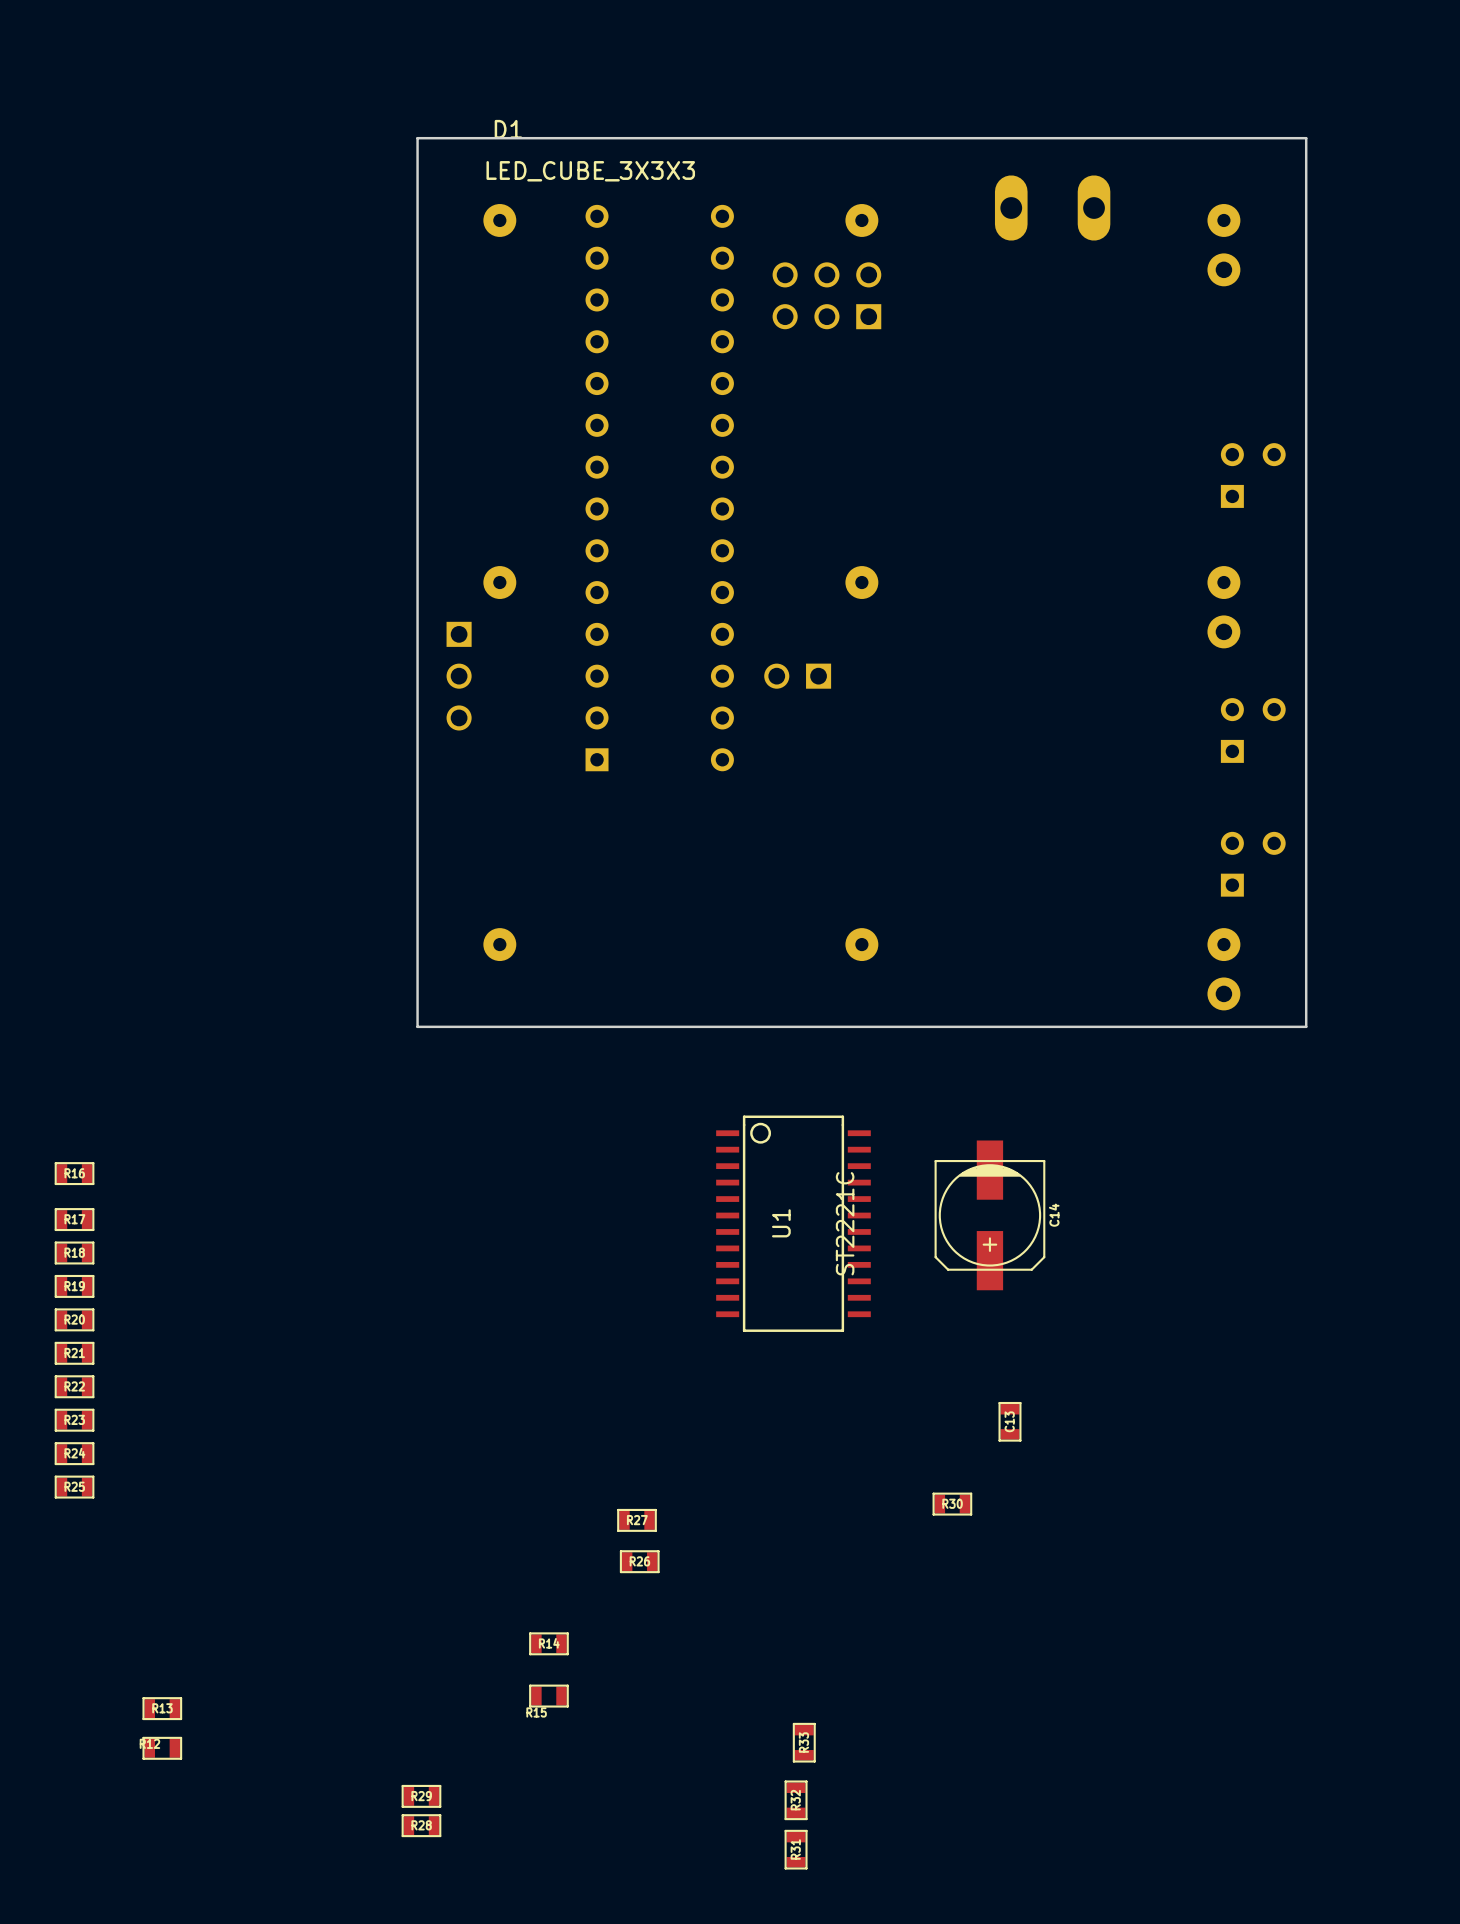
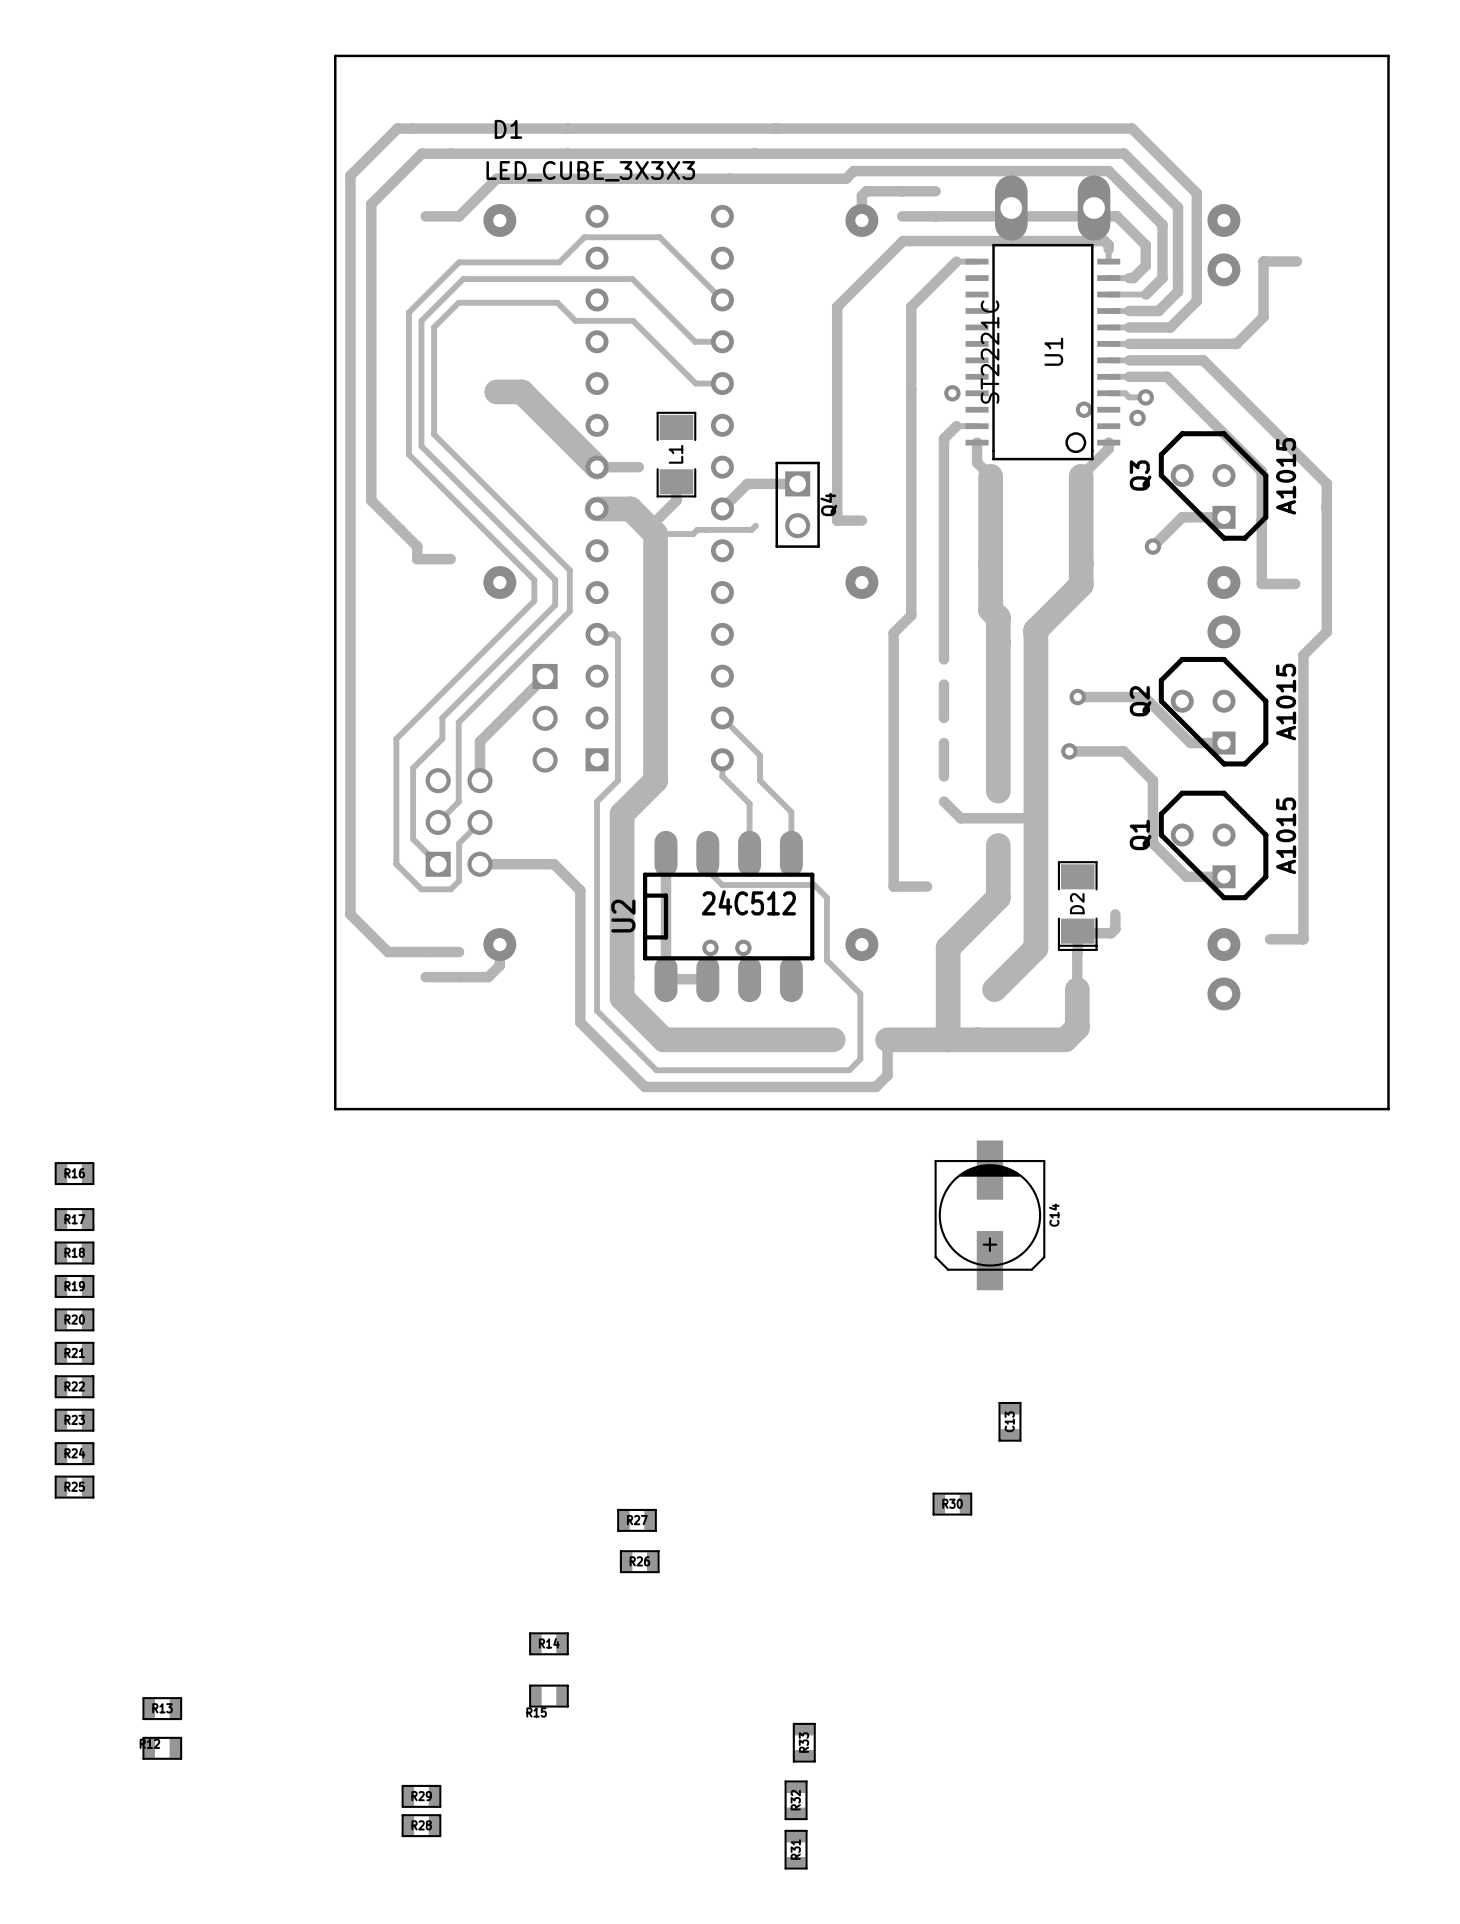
board edge: (417, 138) (417, 1026) (1306, 1026) (1306, 138) (417, 138) -> (335, 55) (335, 1109) (1388, 1109) (1388, 55) (335, 55)
track: none -> (935, 191) (866, 191) (861, 195) (861, 220)
track: none -> (425, 216) (459, 216) (496, 178) (846, 178) (853, 171) (1108, 171) (1162, 224) (1162, 278) (1146, 294) (1108, 294)
track: none -> (902, 216) (1116, 216) (1145, 245) (1145, 265) (1133, 278) (1108, 278)
track: none -> (977, 261) (956, 261) (911, 306) (911, 615) (893, 633) (893, 886) (927, 886)
track: none -> (1108, 261) (1108, 245) (1104, 241) (903, 241) (837, 306) (837, 520) (861, 520)
track: none -> (1296, 261) (1263, 261) (1263, 316) (1236, 343) (1108, 343)
part: (826, 295) -> none
track: none -> (722, 299) (659, 237) (584, 237) (559, 262) (459, 262) (408, 312) (408, 454) (534, 580) (534, 600) (396, 738) (396, 864) (421, 889) (450, 889) (459, 880) (459, 843) (479, 822)
track: none -> (1108, 310) (1158, 310) (1178, 291) (1178, 207) (1124, 153) (421, 153) (371, 204) (371, 500) (417, 546) (417, 559) (450, 559)
track: none -> (1108, 327) (1170, 327) (1196, 301) (1196, 193) (1132, 128) (397, 128) (350, 175) (350, 914) (388, 952) (459, 952)
track: none -> (722, 341) (695, 341) (632, 279) (463, 279) (421, 320) (421, 446) (555, 580) (555, 605) (442, 717) (442, 738) (413, 768) (413, 839) (438, 864)
track: none -> (1108, 360) (1203, 360) (1326, 483) (1326, 631) (1303, 655) (1303, 939) (1270, 939)
track: none -> (1108, 376) (1167, 376) (1261, 471) (1261, 583) (1295, 583)
track: none -> (722, 383) (695, 383) (633, 320) (575, 320) (557, 302) (458, 302) (434, 327) (434, 434) (569, 570) (569, 611) (458, 722) (458, 801) (438, 822)
track: none -> (496, 391) (521, 391) (597, 467) (638, 467)
via: none -> (952, 393)
track: none -> (1108, 393) (1125, 393) (1129, 397) (1145, 397)
via: none -> (1145, 397)
via: none -> (1084, 409)
via: none -> (1137, 417)
track: none -> (977, 426) (956, 426) (943, 438) (943, 659)
track: none -> (977, 442) (977, 462) (990, 476) (990, 609) (998, 617) (998, 791)
track: none -> (1108, 442) (1108, 448) (1081, 476) (1081, 584) (1035, 630) (1035, 948) (994, 989)
L1: none -> (676, 454)
Q3 side: bottom (1253, 475) -> top (1213, 485)
track: none -> (676, 481) (676, 500) (649, 527)
track: none -> (797, 483) (747, 483) (722, 508)
track: none -> (597, 508) (630, 508) (655, 534)
track: none -> (1224, 517) (1182, 517) (1152, 546)
track: none -> (755, 525) (751, 529) (697, 529) (693, 534) (655, 534)
track: none -> (655, 534) (655, 780) (622, 814) (622, 998) (663, 1039) (833, 1039)
via: none -> (1152, 546)
track: none -> (597, 634) (613, 634) (617, 638) (617, 780) (597, 801) (597, 1010) (656, 1070) (849, 1070) (860, 1059) (860, 993) (826, 960) (826, 897) (814, 885) (722, 885) (707, 870) (707, 853)
part position: (459, 676) -> (545, 718)
track: none -> (545, 676) (479, 741) (479, 780)
Q4 side: bottom (797, 676) -> top (797, 504)
track: none -> (943, 684) (943, 717)
track: none -> (1077, 697) (1144, 697) (1190, 743) (1224, 743)
via: none -> (1077, 697)
track: none -> (722, 717) (760, 755) (760, 780) (791, 812) (791, 853)
Q2 side: bottom (1253, 730) -> top (1213, 711)
track: none -> (943, 743) (943, 776)
track: none -> (1069, 751) (1123, 751) (1152, 780) (1152, 843) (1186, 876) (1224, 876)
via: none -> (1069, 751)
track: none -> (722, 759) (722, 776) (749, 803) (749, 853)
track: none -> (943, 801) (960, 818) (1035, 818)
part: none -> (459, 822)
track: none -> (998, 845) (998, 897) (948, 947) (948, 1039)
track: none -> (666, 853) (666, 979) (707, 979)
track: none -> (479, 864) (554, 864) (580, 890) (580, 1022) (644, 1086) (875, 1086) (887, 1075) (887, 1039) (1065, 1039) (1077, 1027) (1077, 933) (1111, 933) (1115, 929) (1115, 914)
Q1 side: bottom (1253, 864) -> top (1213, 845)
D2: none -> (1077, 906)
U2: none -> 24C512 (728, 916)
track: none -> (499, 944) (499, 965) (488, 977) (425, 977)
via: none -> (710, 947)
via: none -> (743, 947)
U1 rotation: 0° (793, 1223) -> 180° (1042, 352)
U1 position: (793, 1223) -> (1042, 352)

